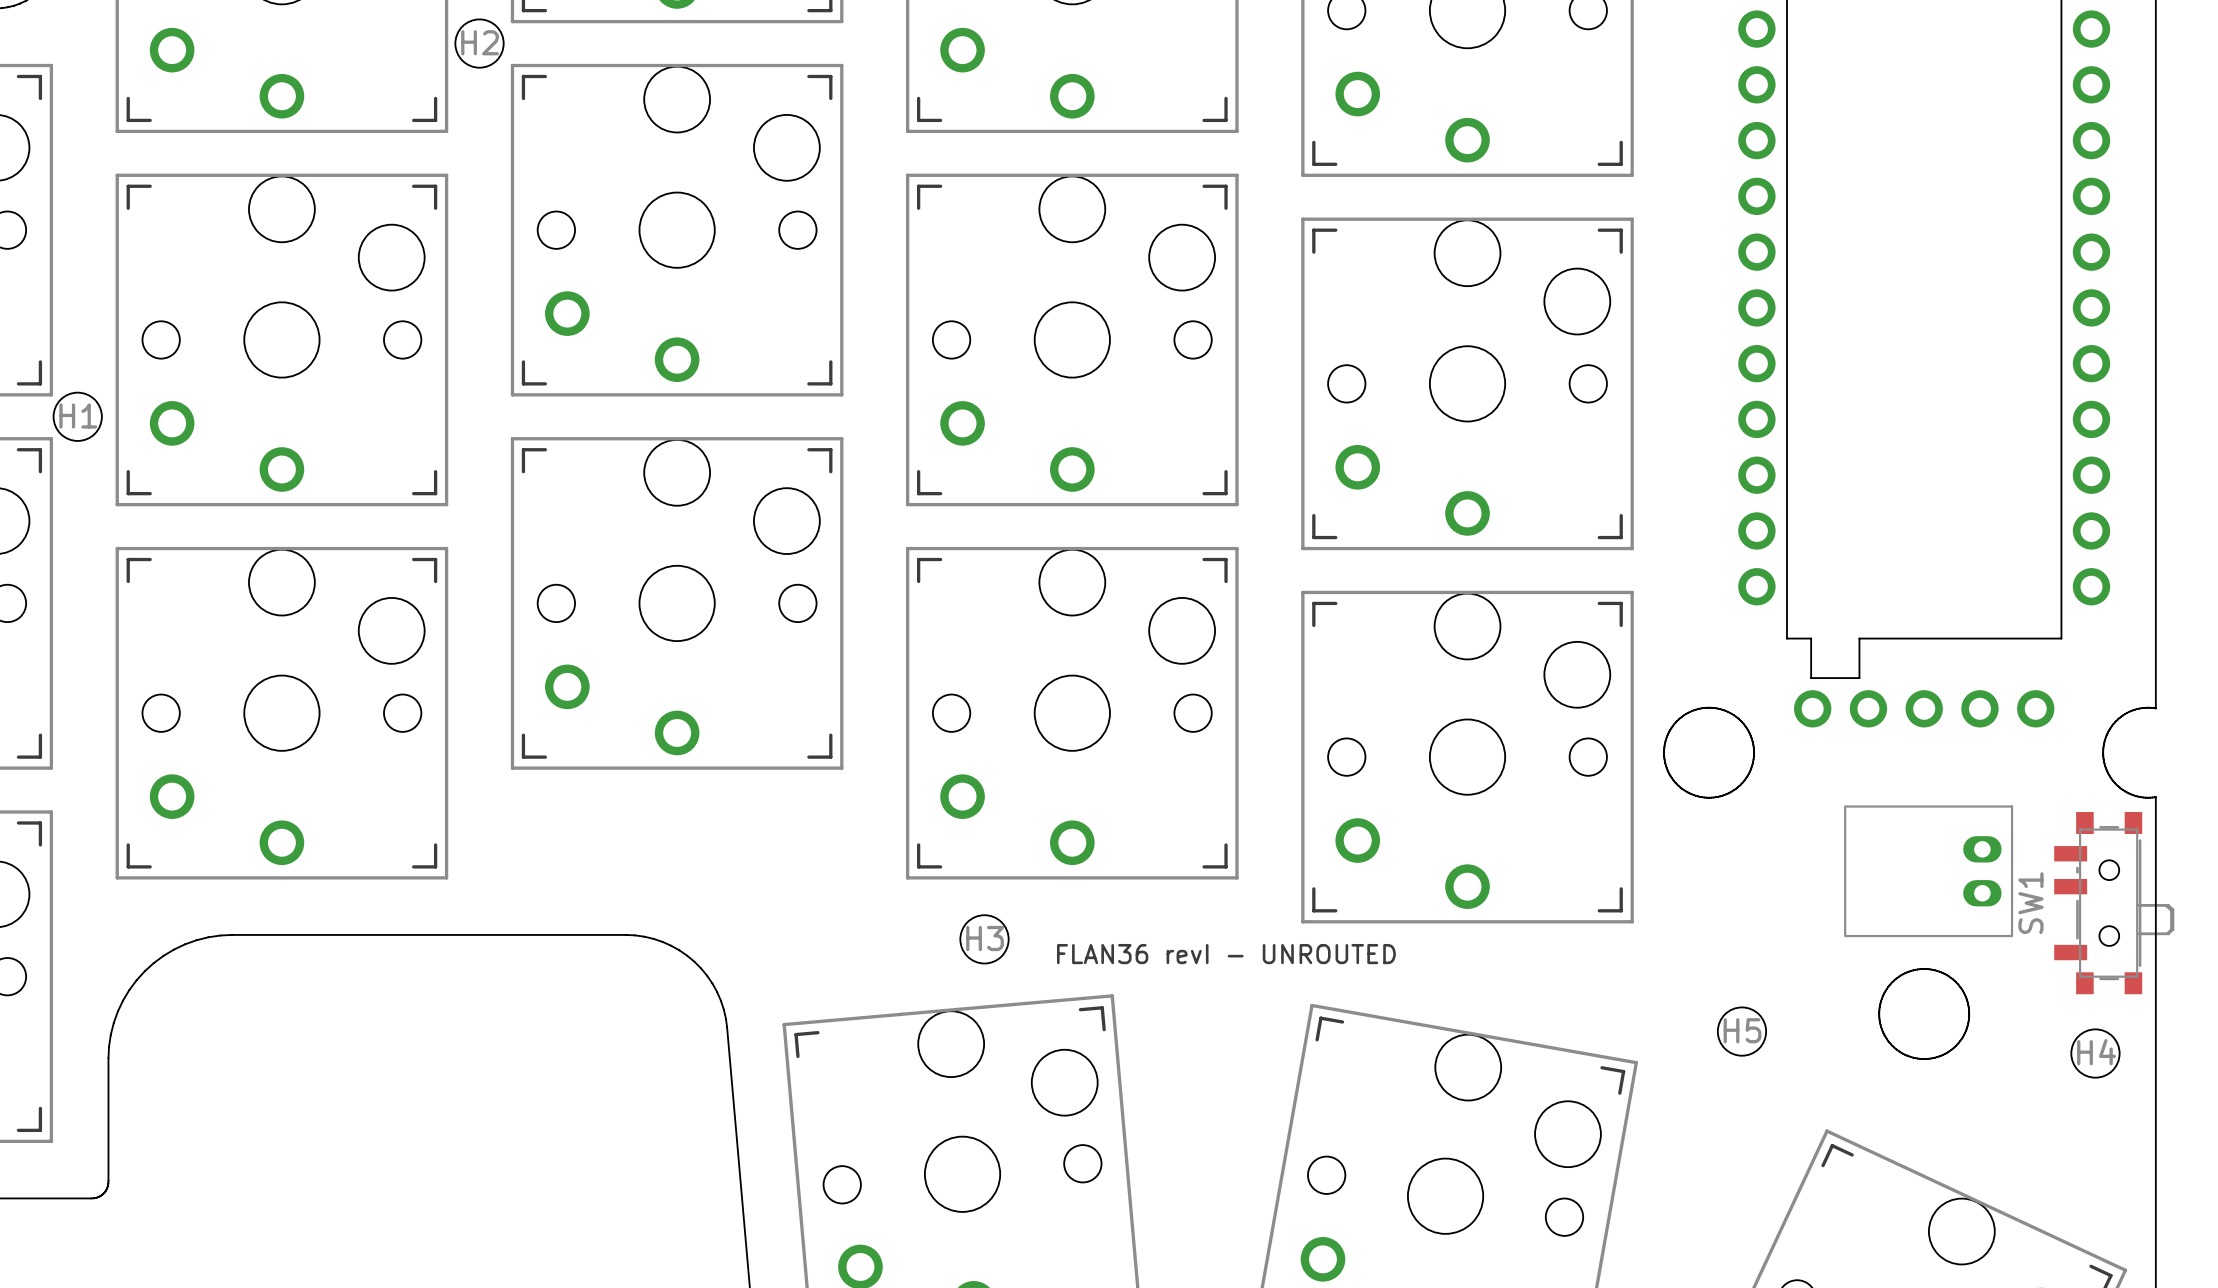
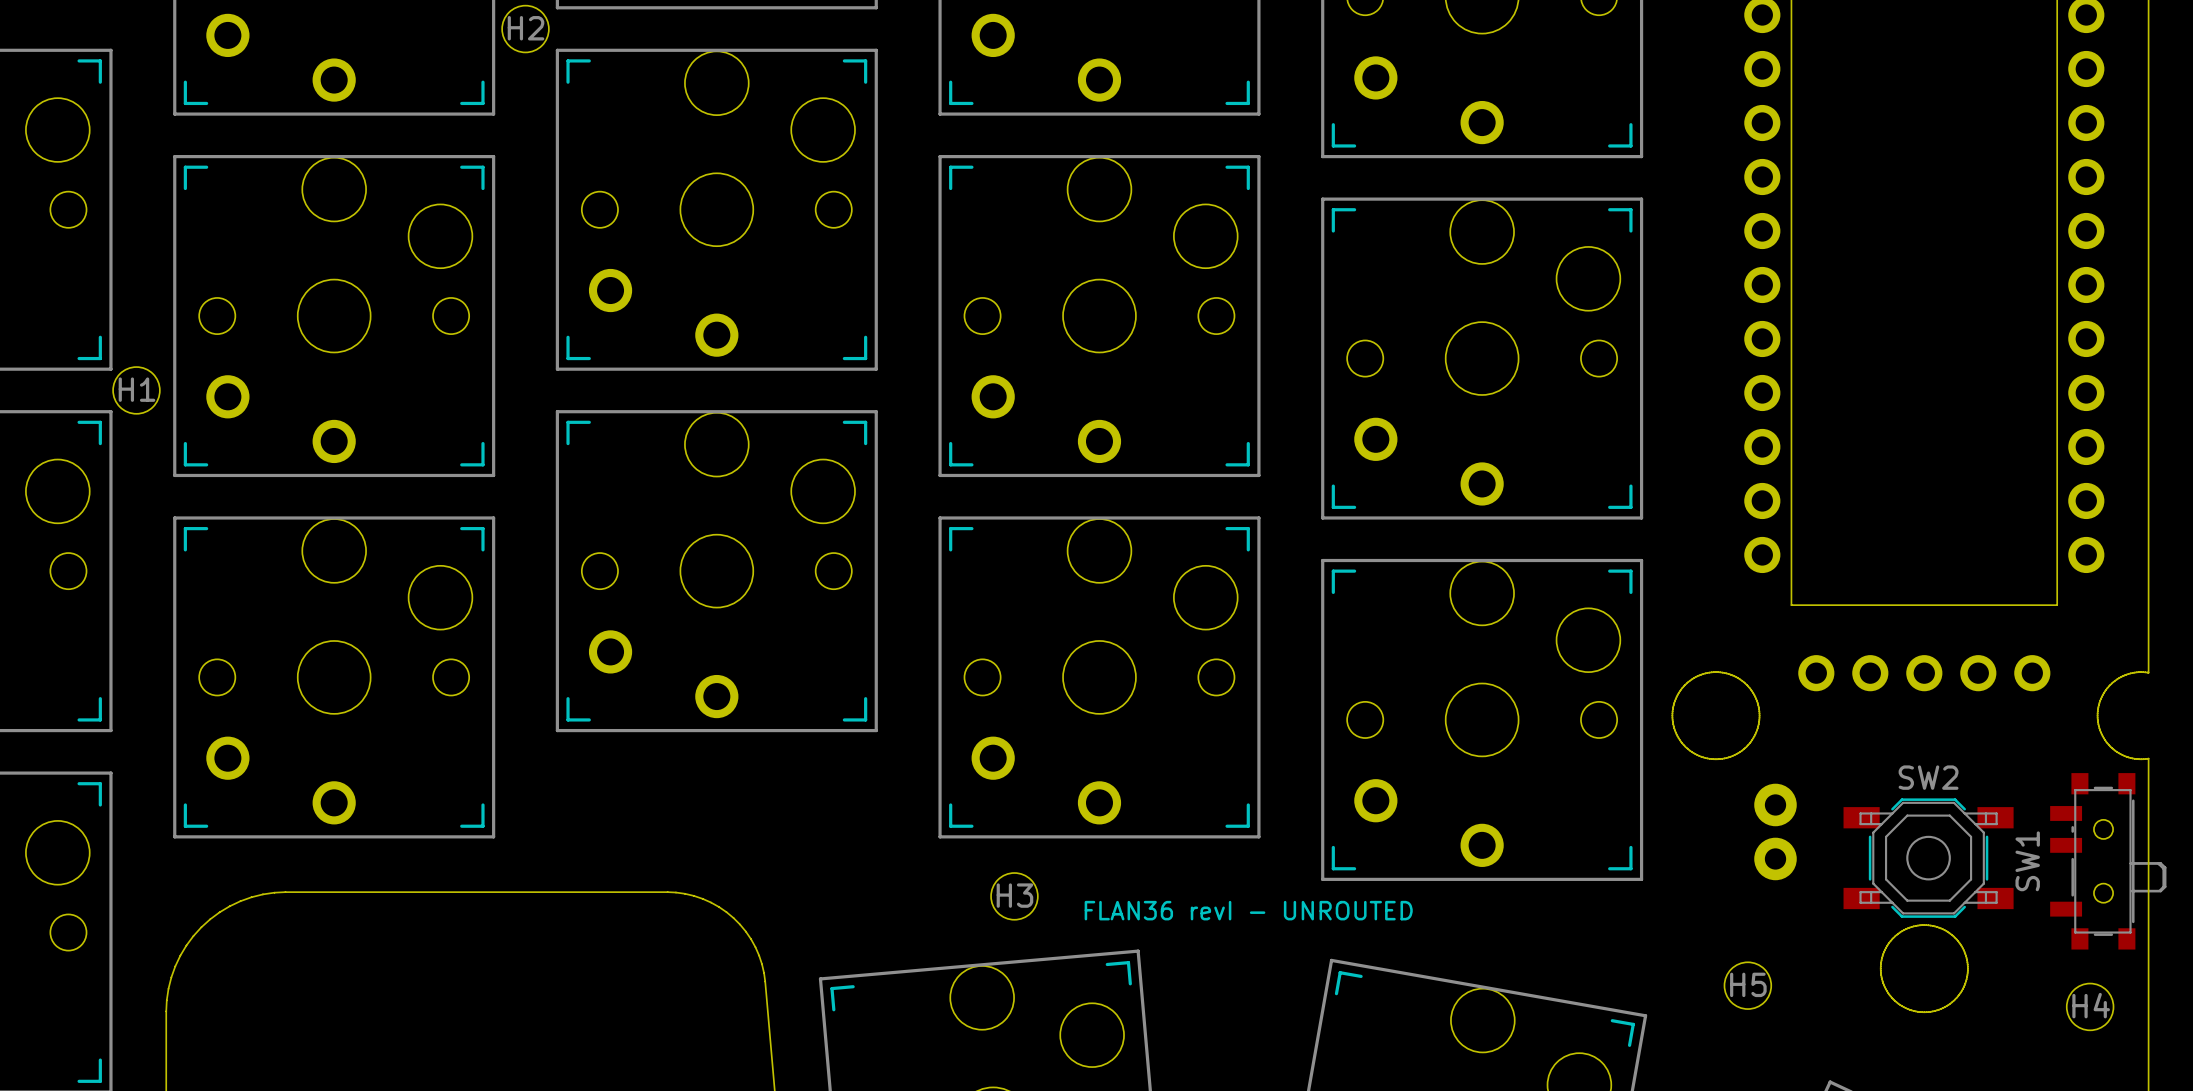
board edge: (1811, 638) (1811, 678) (1859, 678) (1859, 638) -> (1814, 605) (1861, 605)
part: (1928, 871) -> none
part: none -> (1775, 831)
SW2: none -> (1928, 858)

